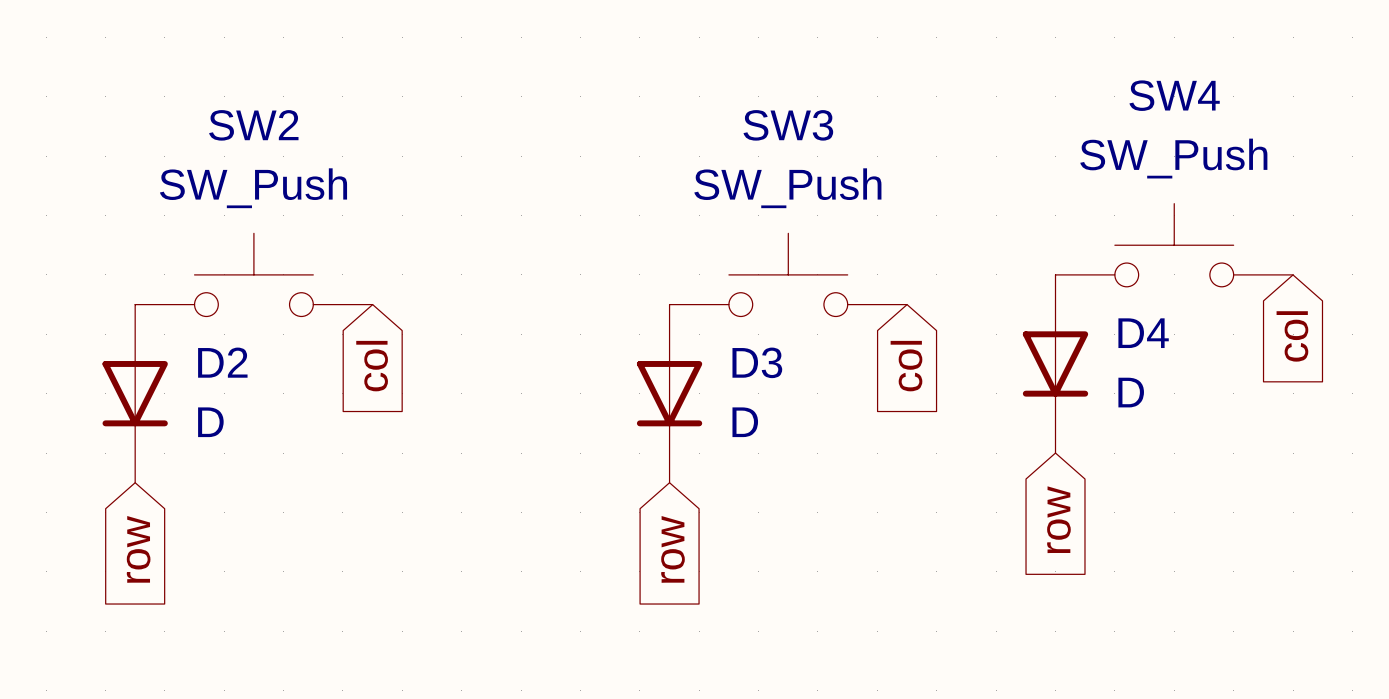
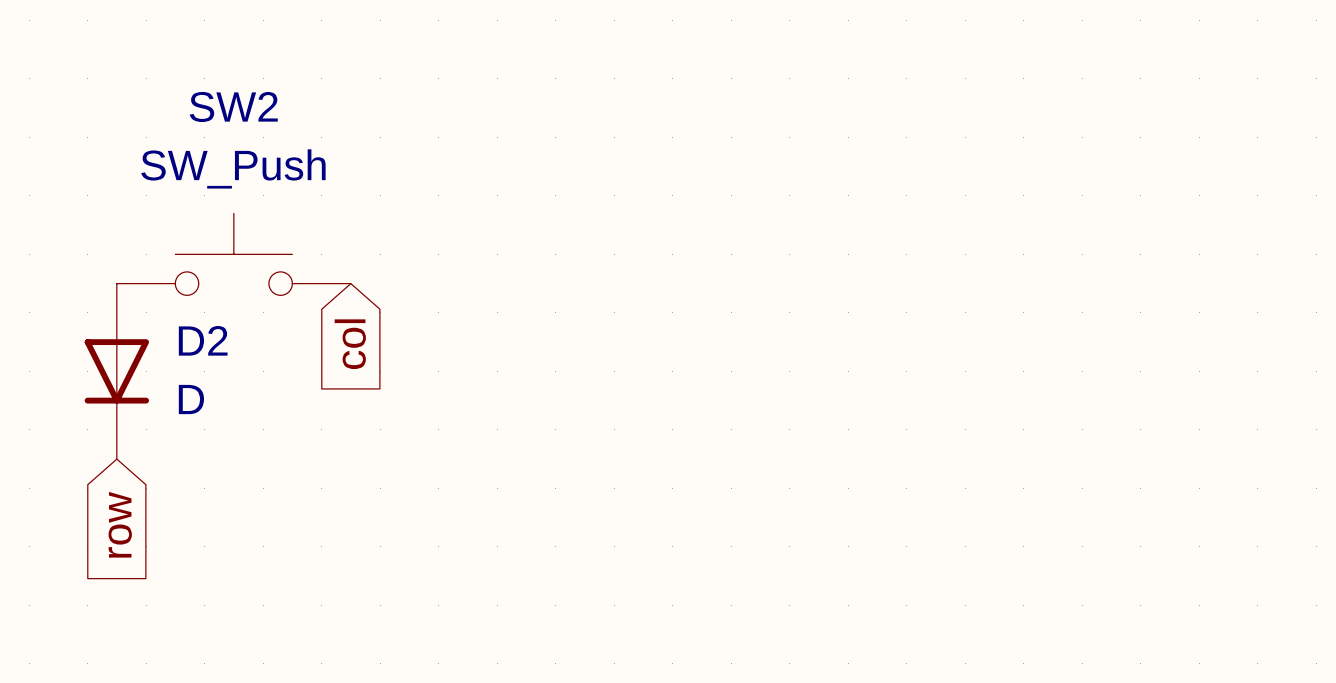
SW4: SW_Push (1174, 245) -> none
SW3: SW_Push (788, 274) -> none
global label: col (1292, 336) -> none
D4: D (1055, 363) -> none
global label: col (906, 366) -> none
D3: D (669, 393) -> none
global label: row (1058, 519) -> none
global label: row (673, 549) -> none

